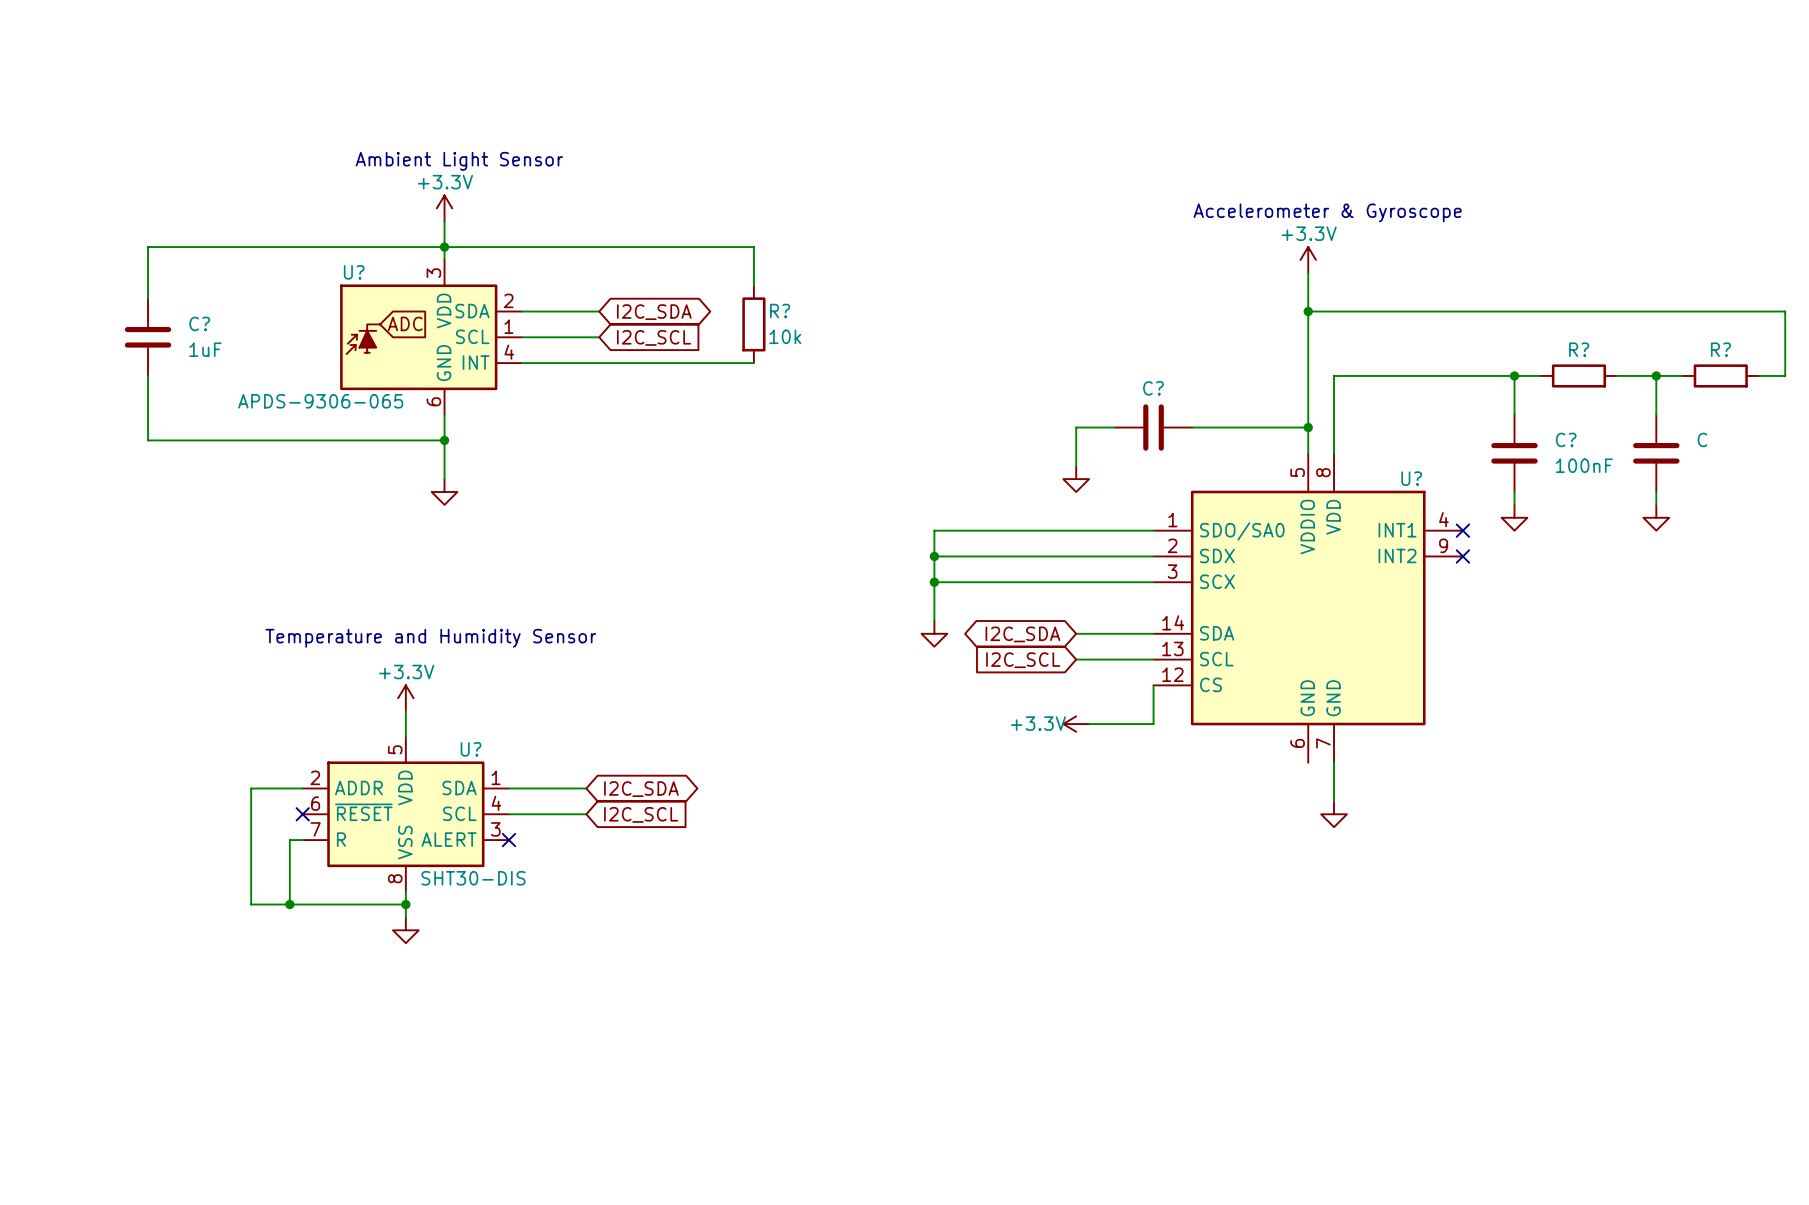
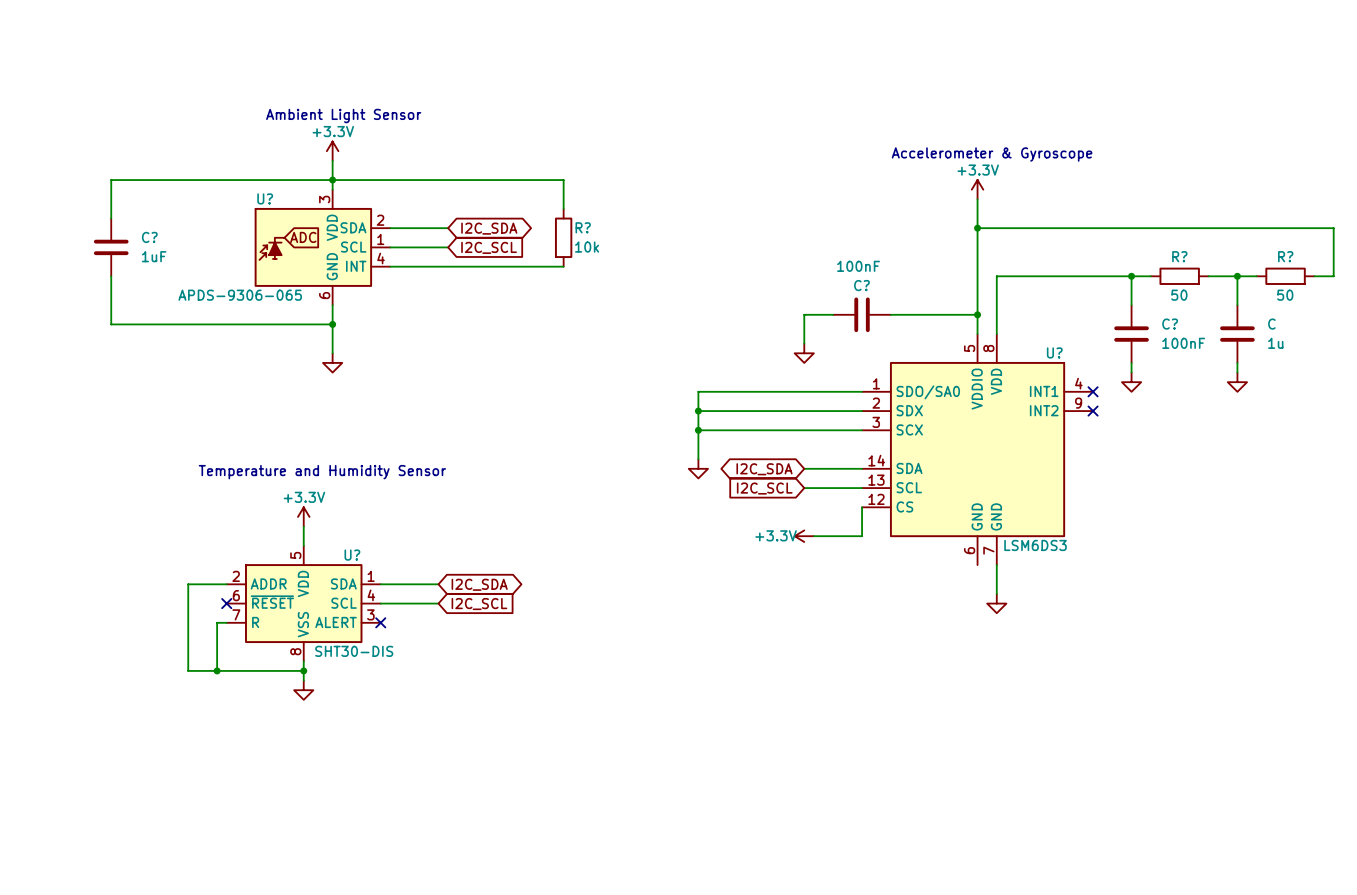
C? value: none -> 100nF (858, 266)
R? value: none -> 50 (1179, 295)
R? value: none -> 50 (1285, 295)
C value: none -> 1u (1275, 343)
U? value: none -> LSM6DS3 (1035, 545)

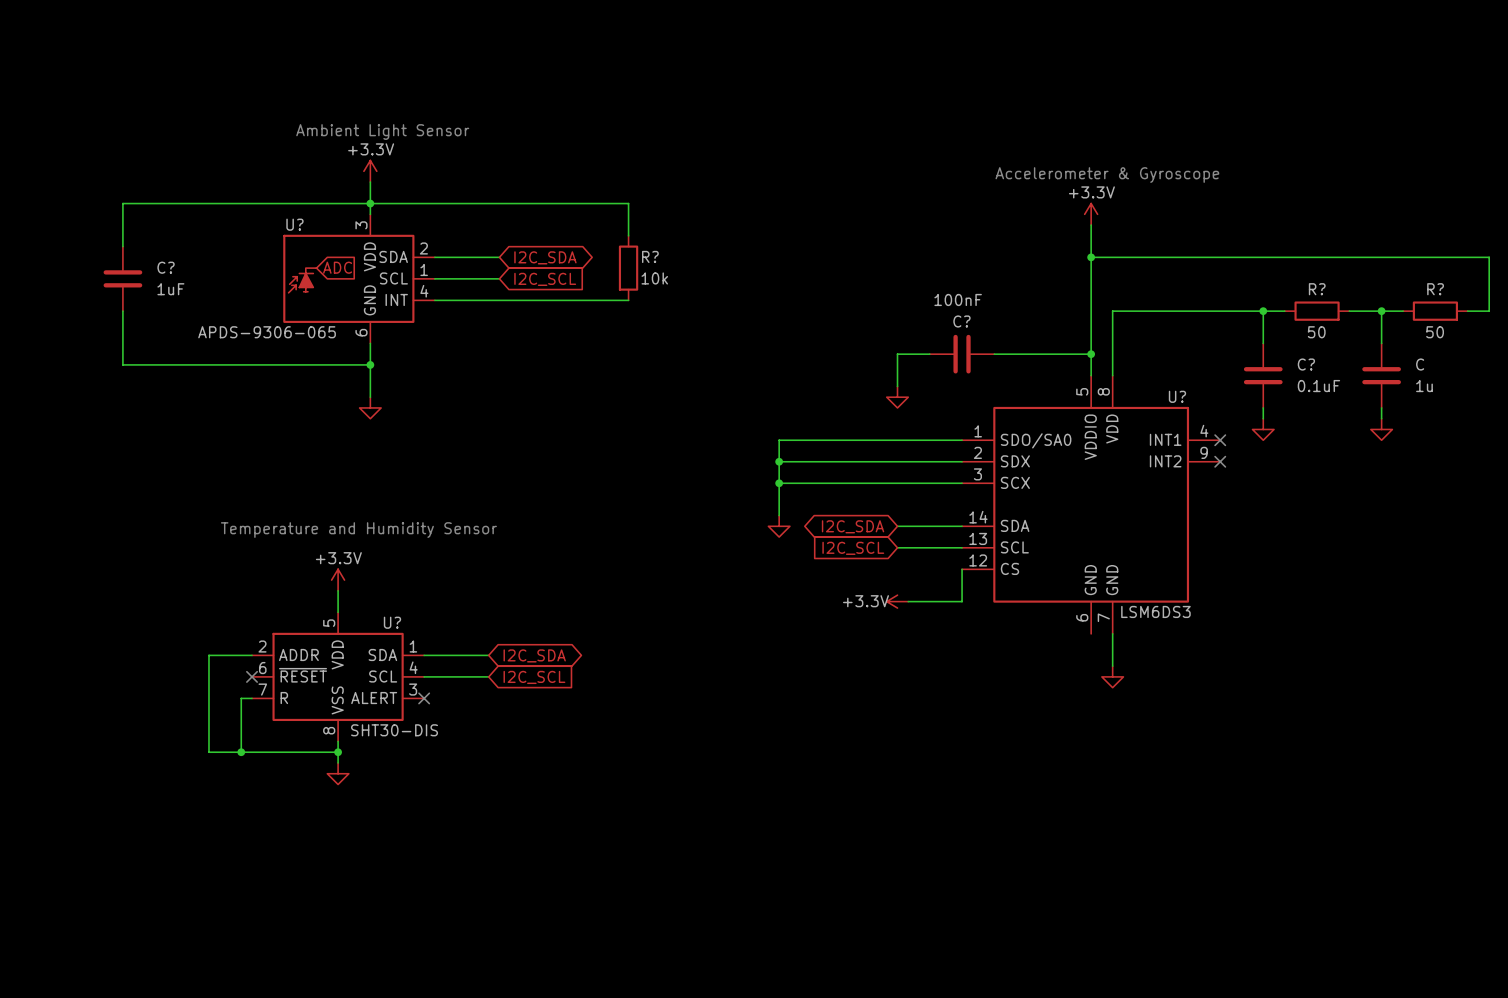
C? value: 100nF (1183, 343) -> 0.1uF (1318, 386)

